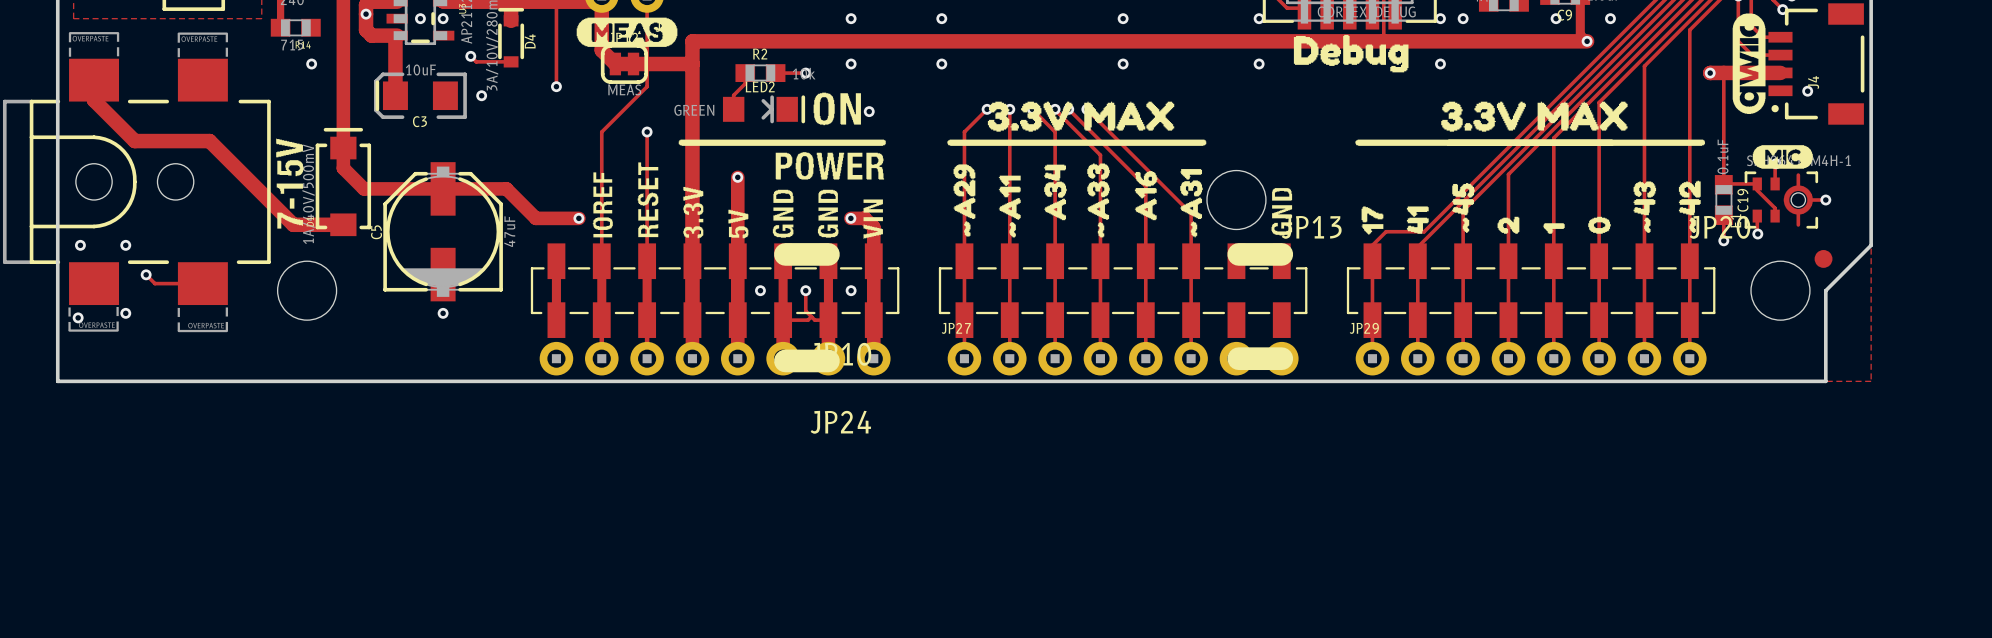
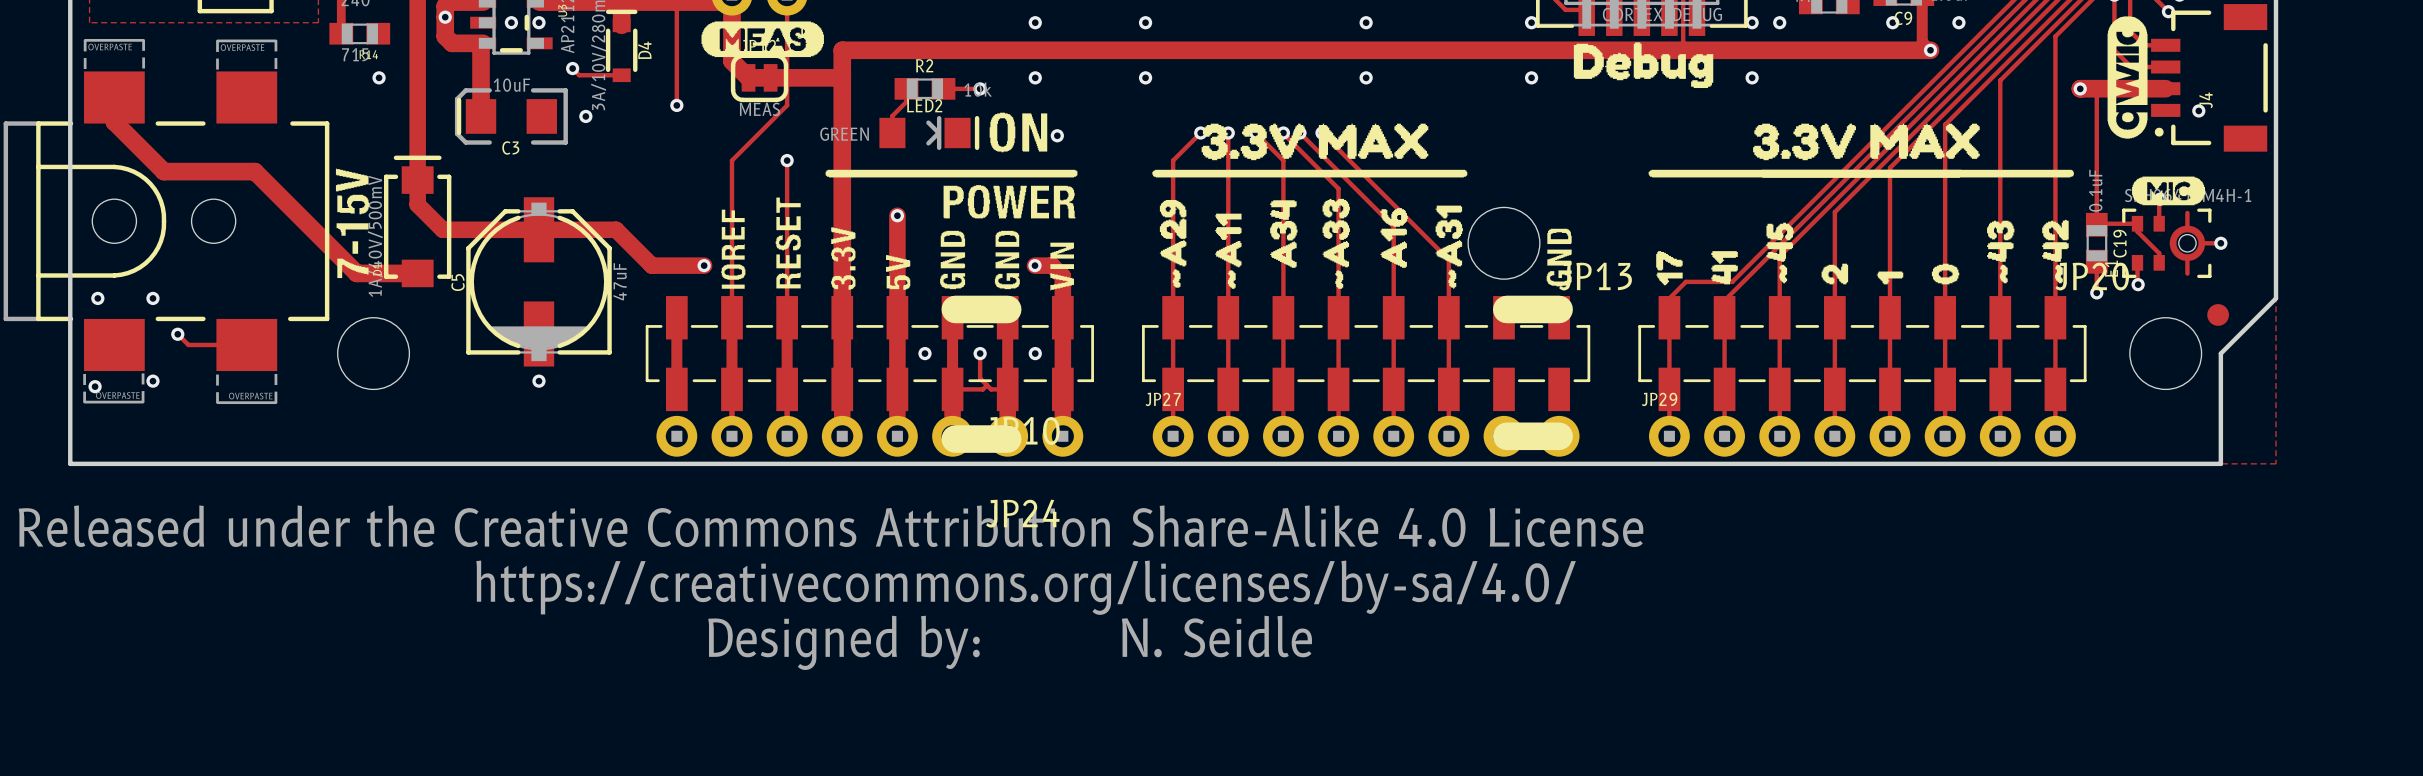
drawing: none -> [18, 505, 1644, 670]
text: none -> N. Seidle (1216, 636)

